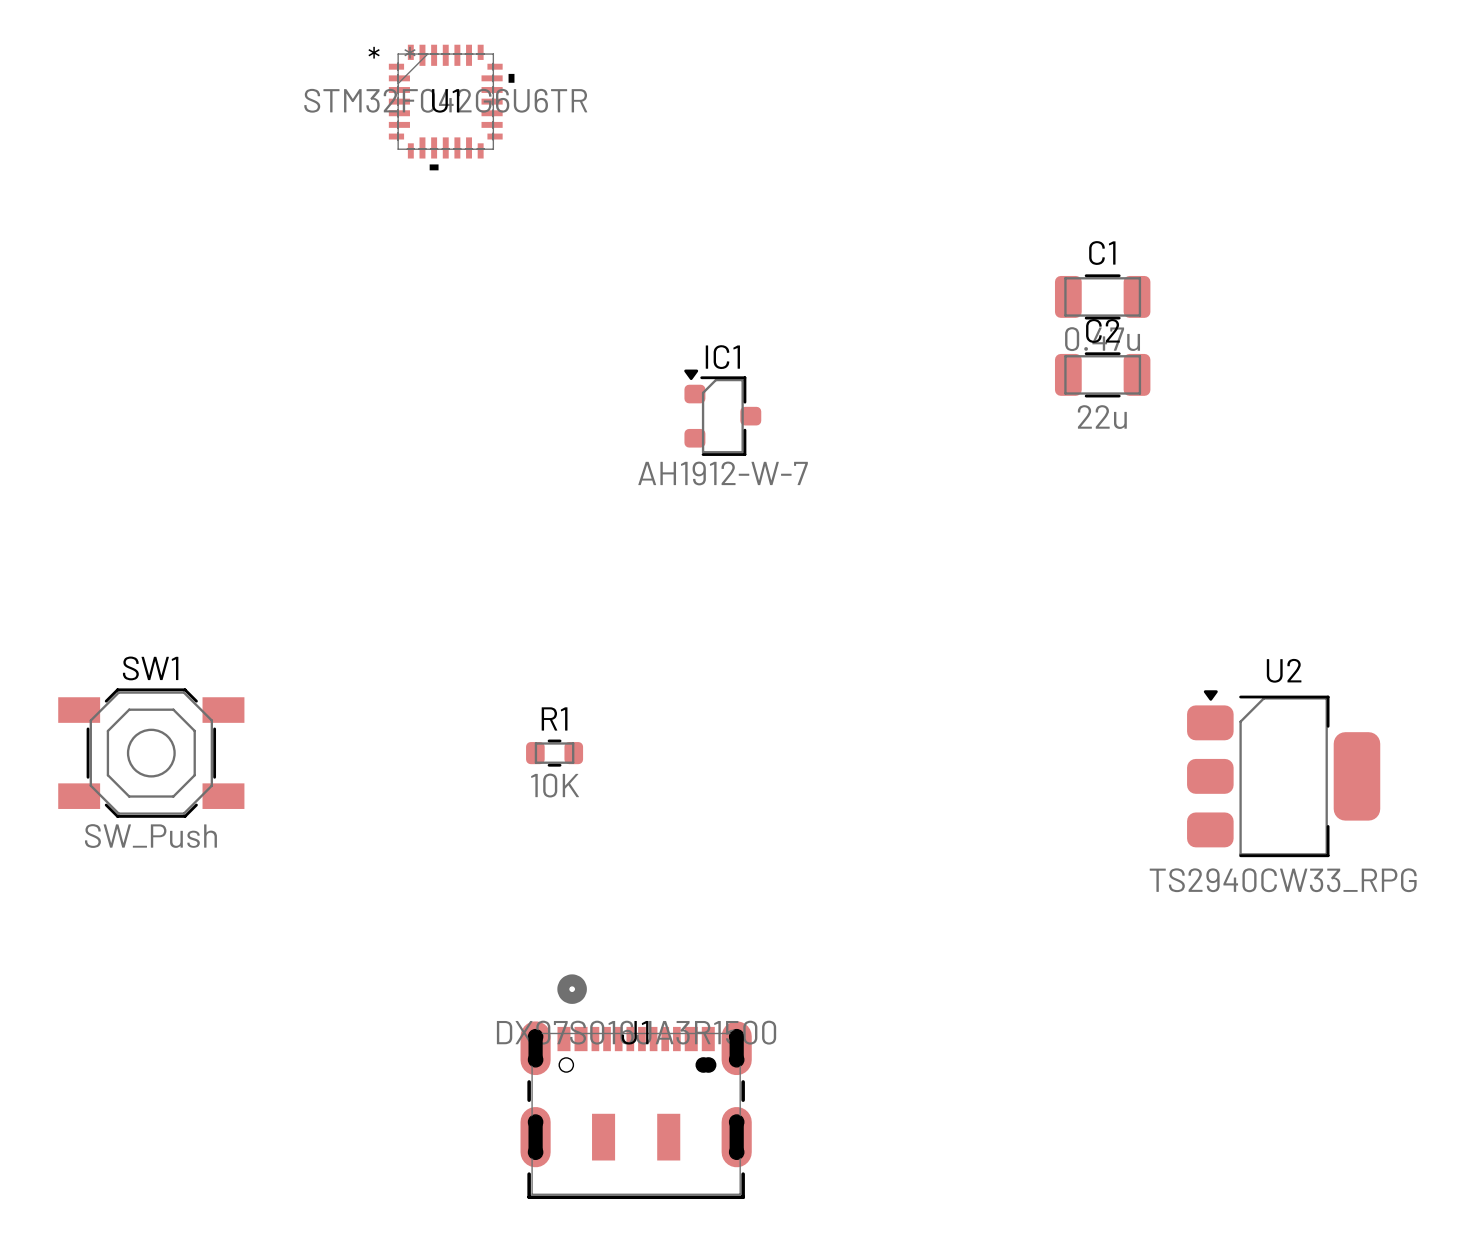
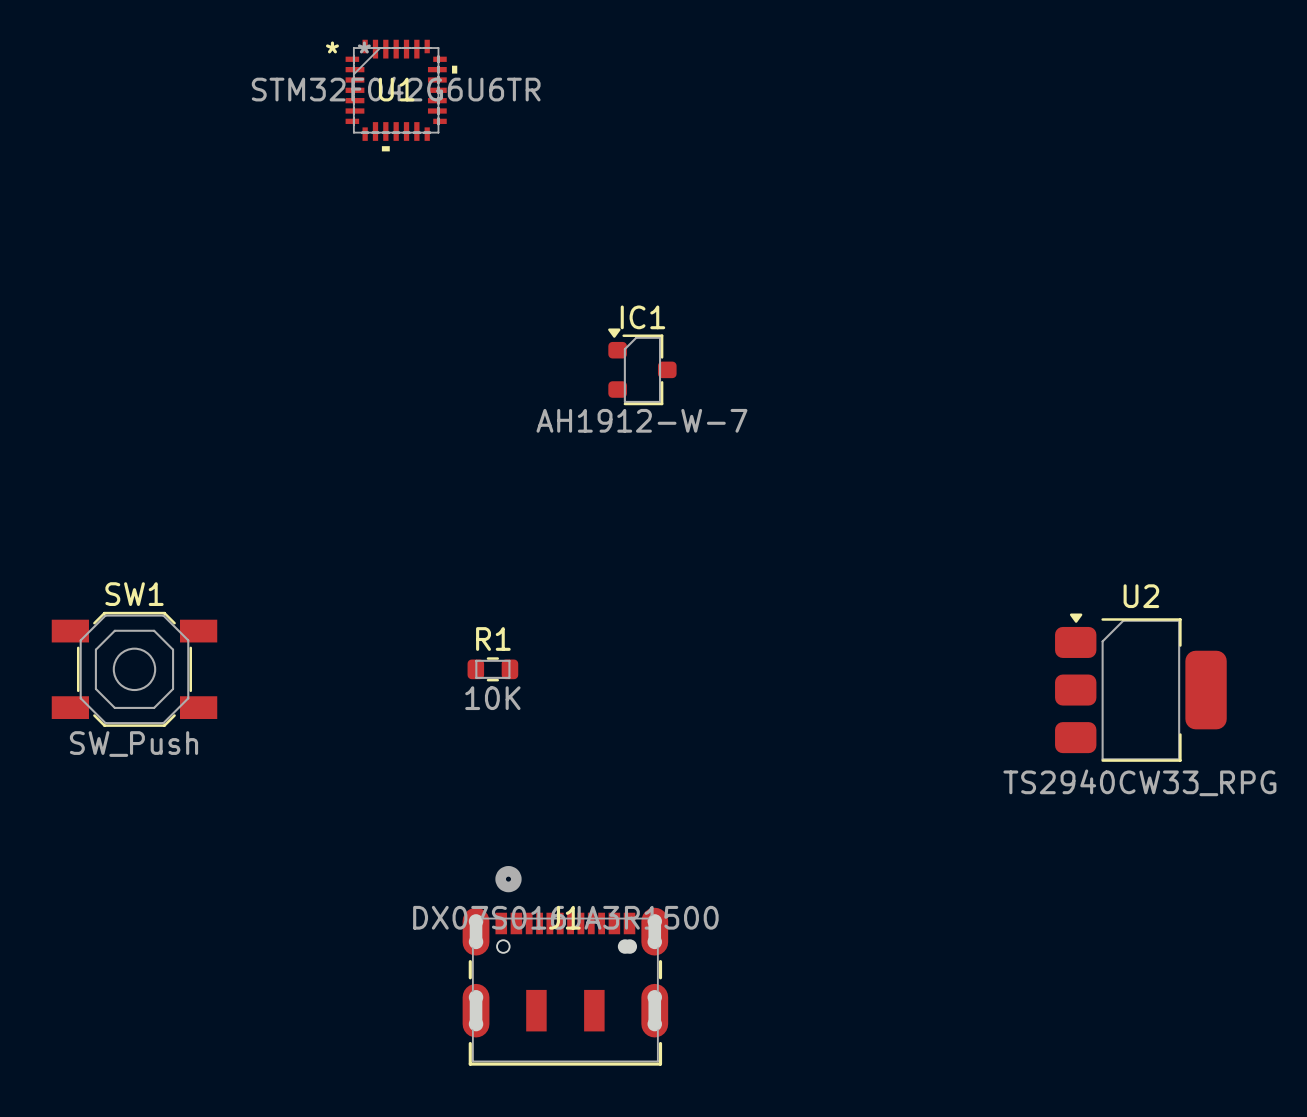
C1: 0.47u (1102, 296) -> none
C2: 22u (1102, 374) -> none

